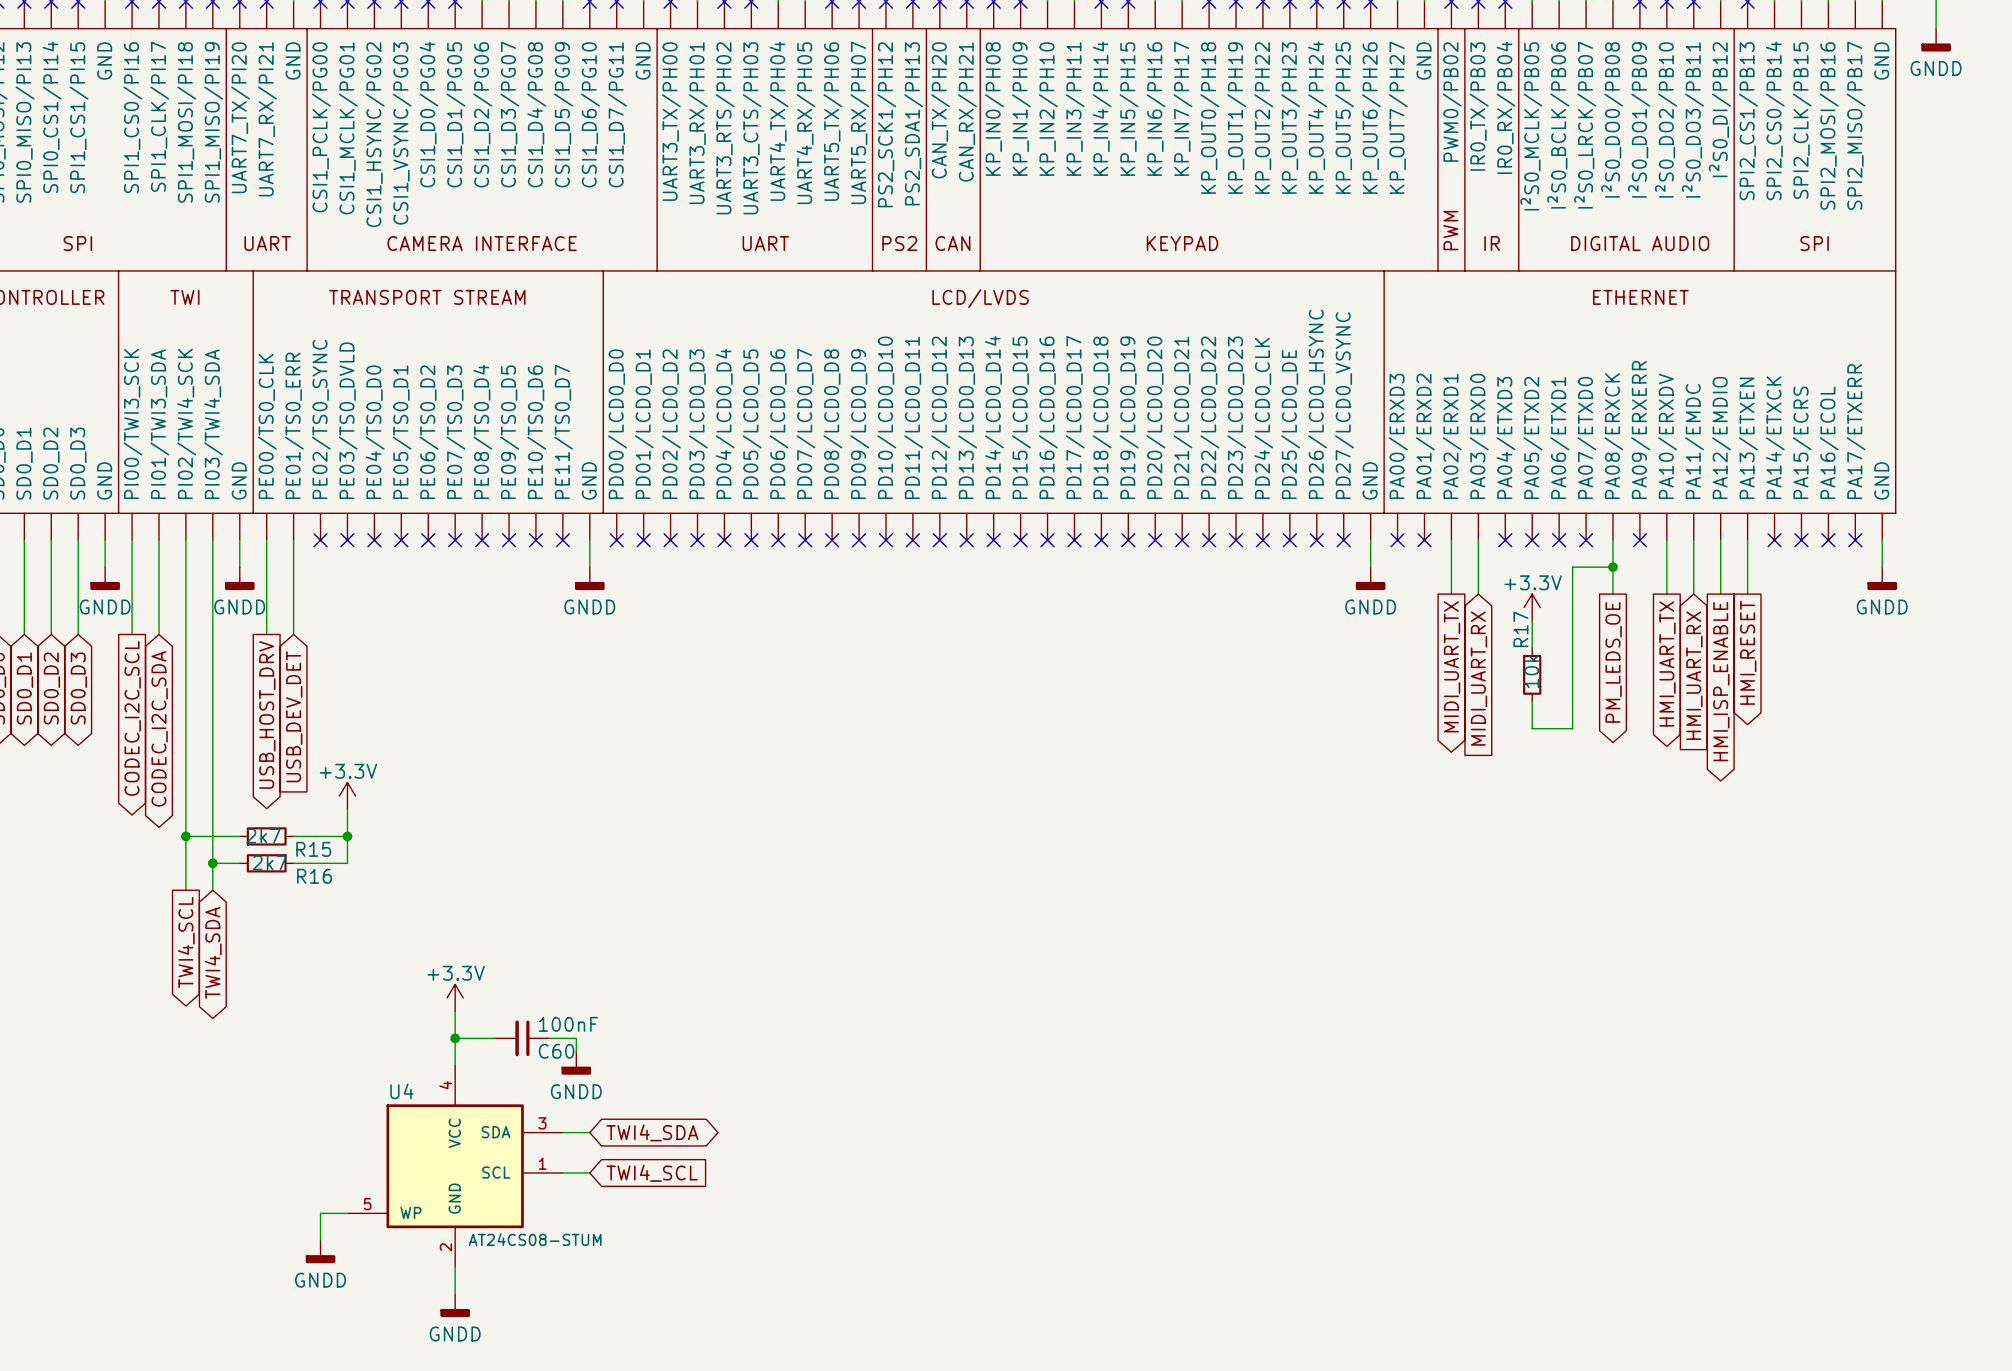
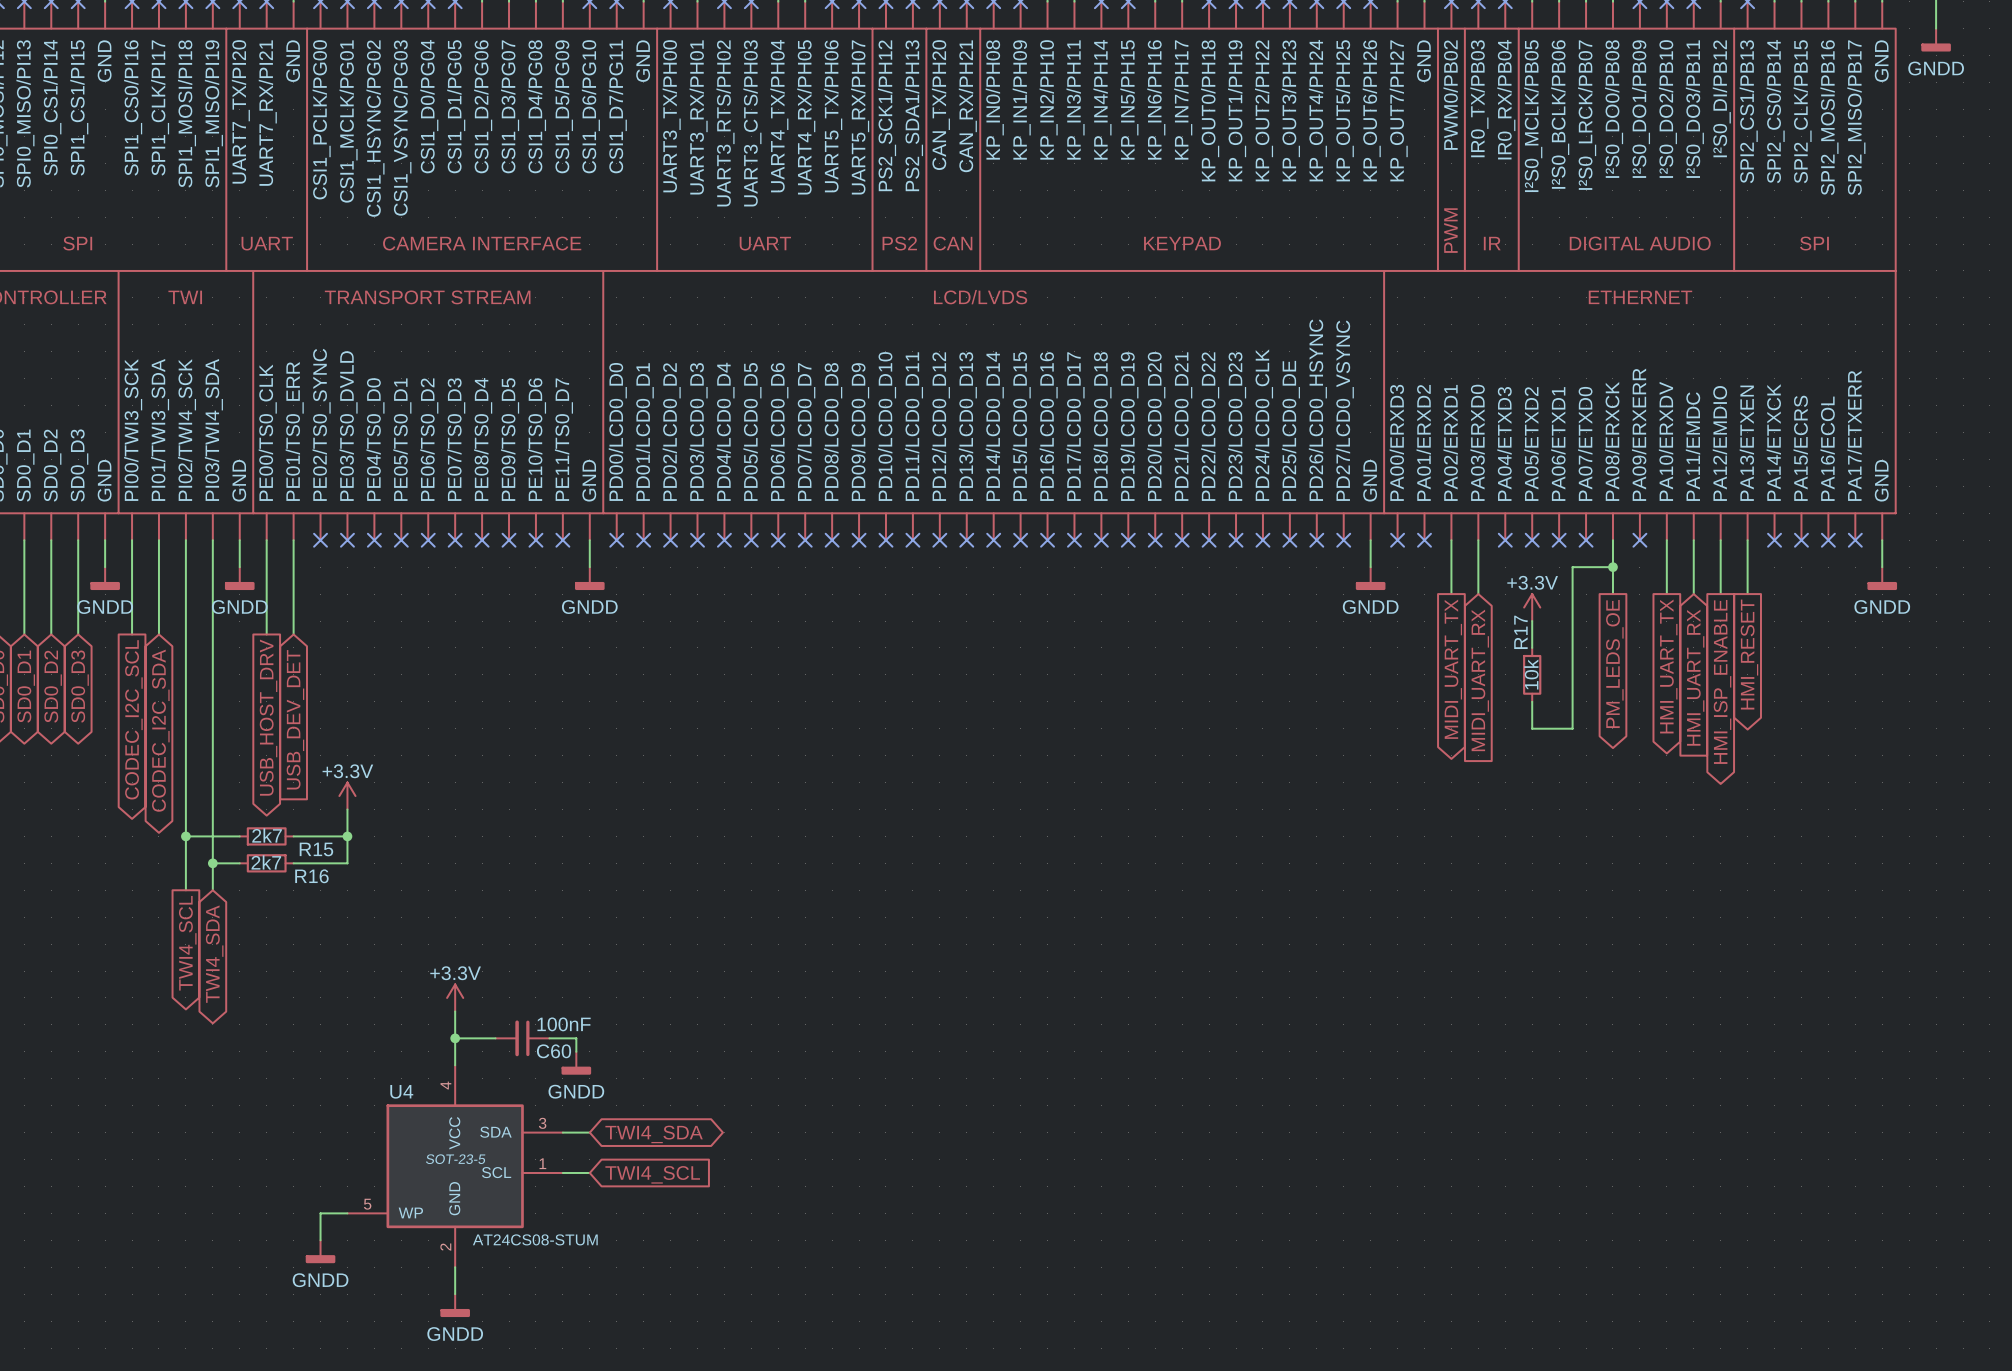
U4 text: none -> SOT-23-5 (455, 1159)

